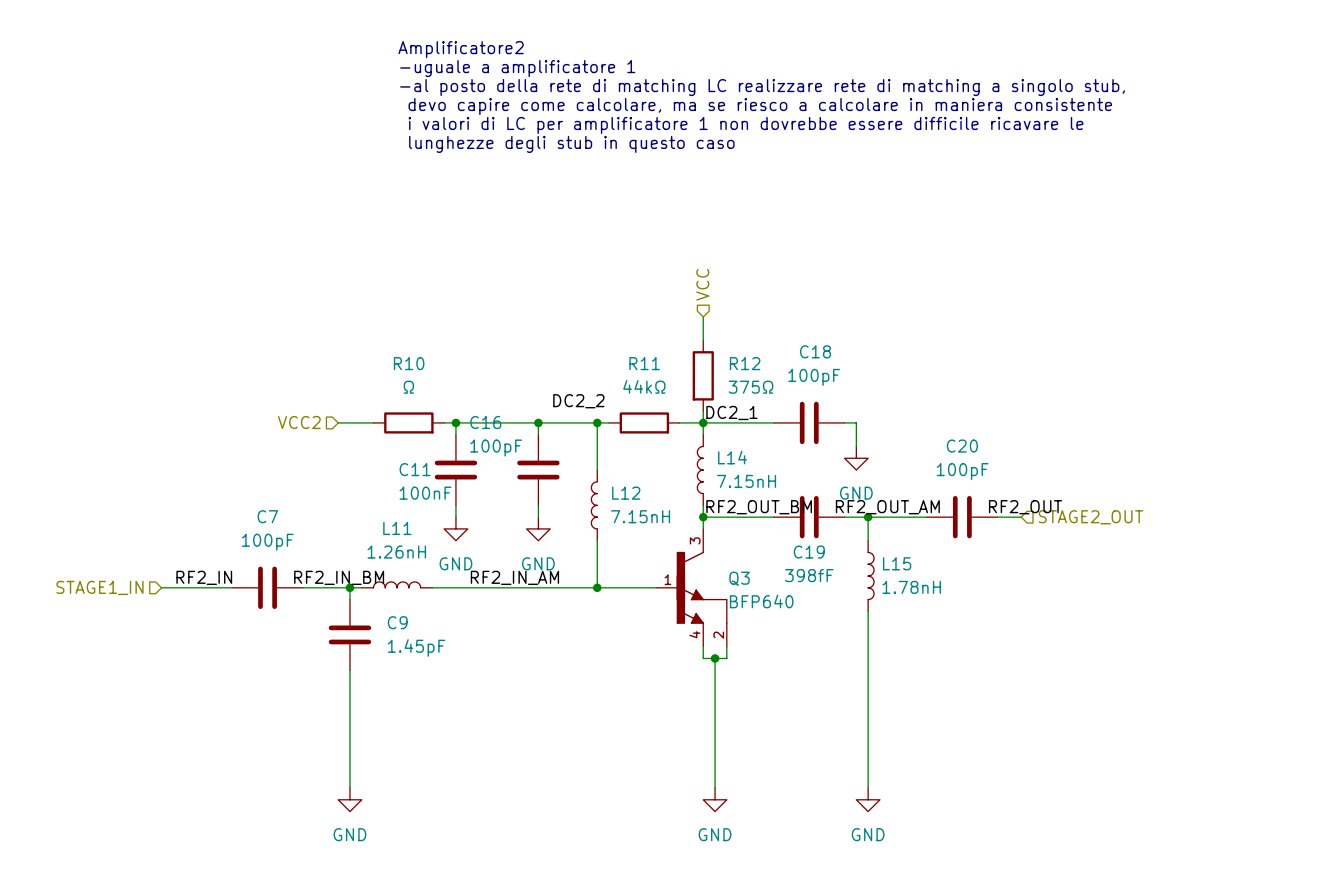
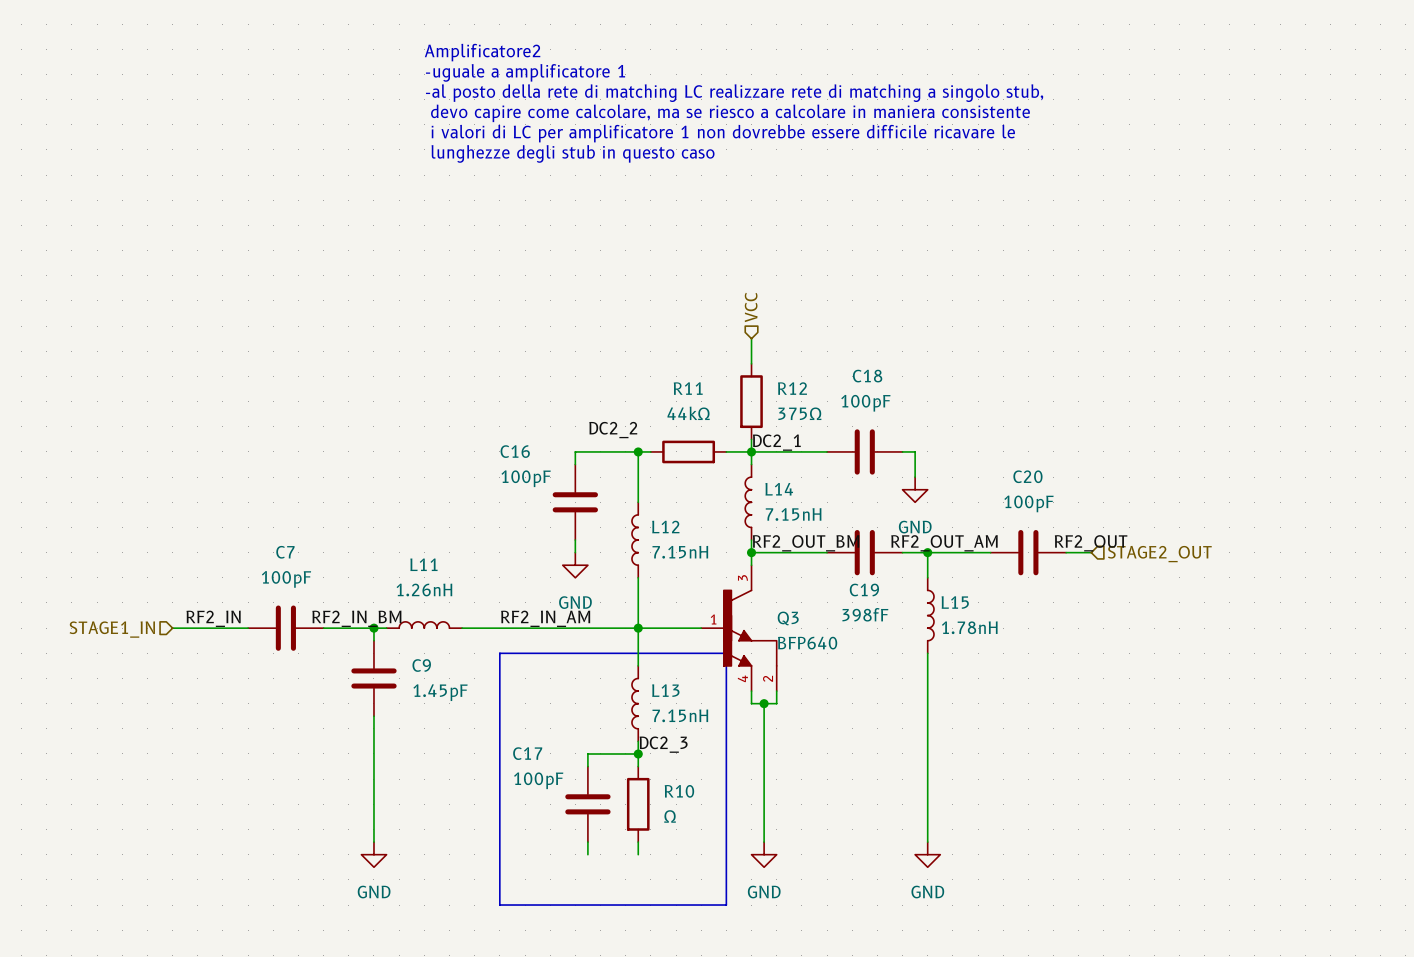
R10 name position: R10 (409, 363) -> R10 (679, 791)
hierarchical label: VCC2 (299, 422) -> none
wire: (338, 422) (373, 422) -> none
R10 rotation: 0° (408, 422) -> 90° clockwise (638, 804)
R10 position: (408, 422) -> (638, 804)
wire: (444, 422) (538, 422) -> none
wire: (455, 422) (455, 434) -> none
junction: (455, 422) -> none
junction: (538, 422) -> none
C11: 100nF (455, 470) -> none
wire: (455, 505) (455, 517) -> none
power symbol: GND (455, 528) -> none
wire: none -> (638, 628) (638, 665)
line: none -> (499, 653) (499, 905) (726, 905) (726, 653) (499, 653)
L13: none -> 7.15nH (635, 703)
wire: none -> (638, 741) (638, 766)
label: none -> DC2_3 (663, 744)
wire: none -> (638, 753) (587, 753) (587, 766)
junction: none -> (638, 753)
C17: none -> 100pF (587, 804)
wire: none -> (587, 842) (587, 854)
wire: none -> (638, 842) (638, 854)

